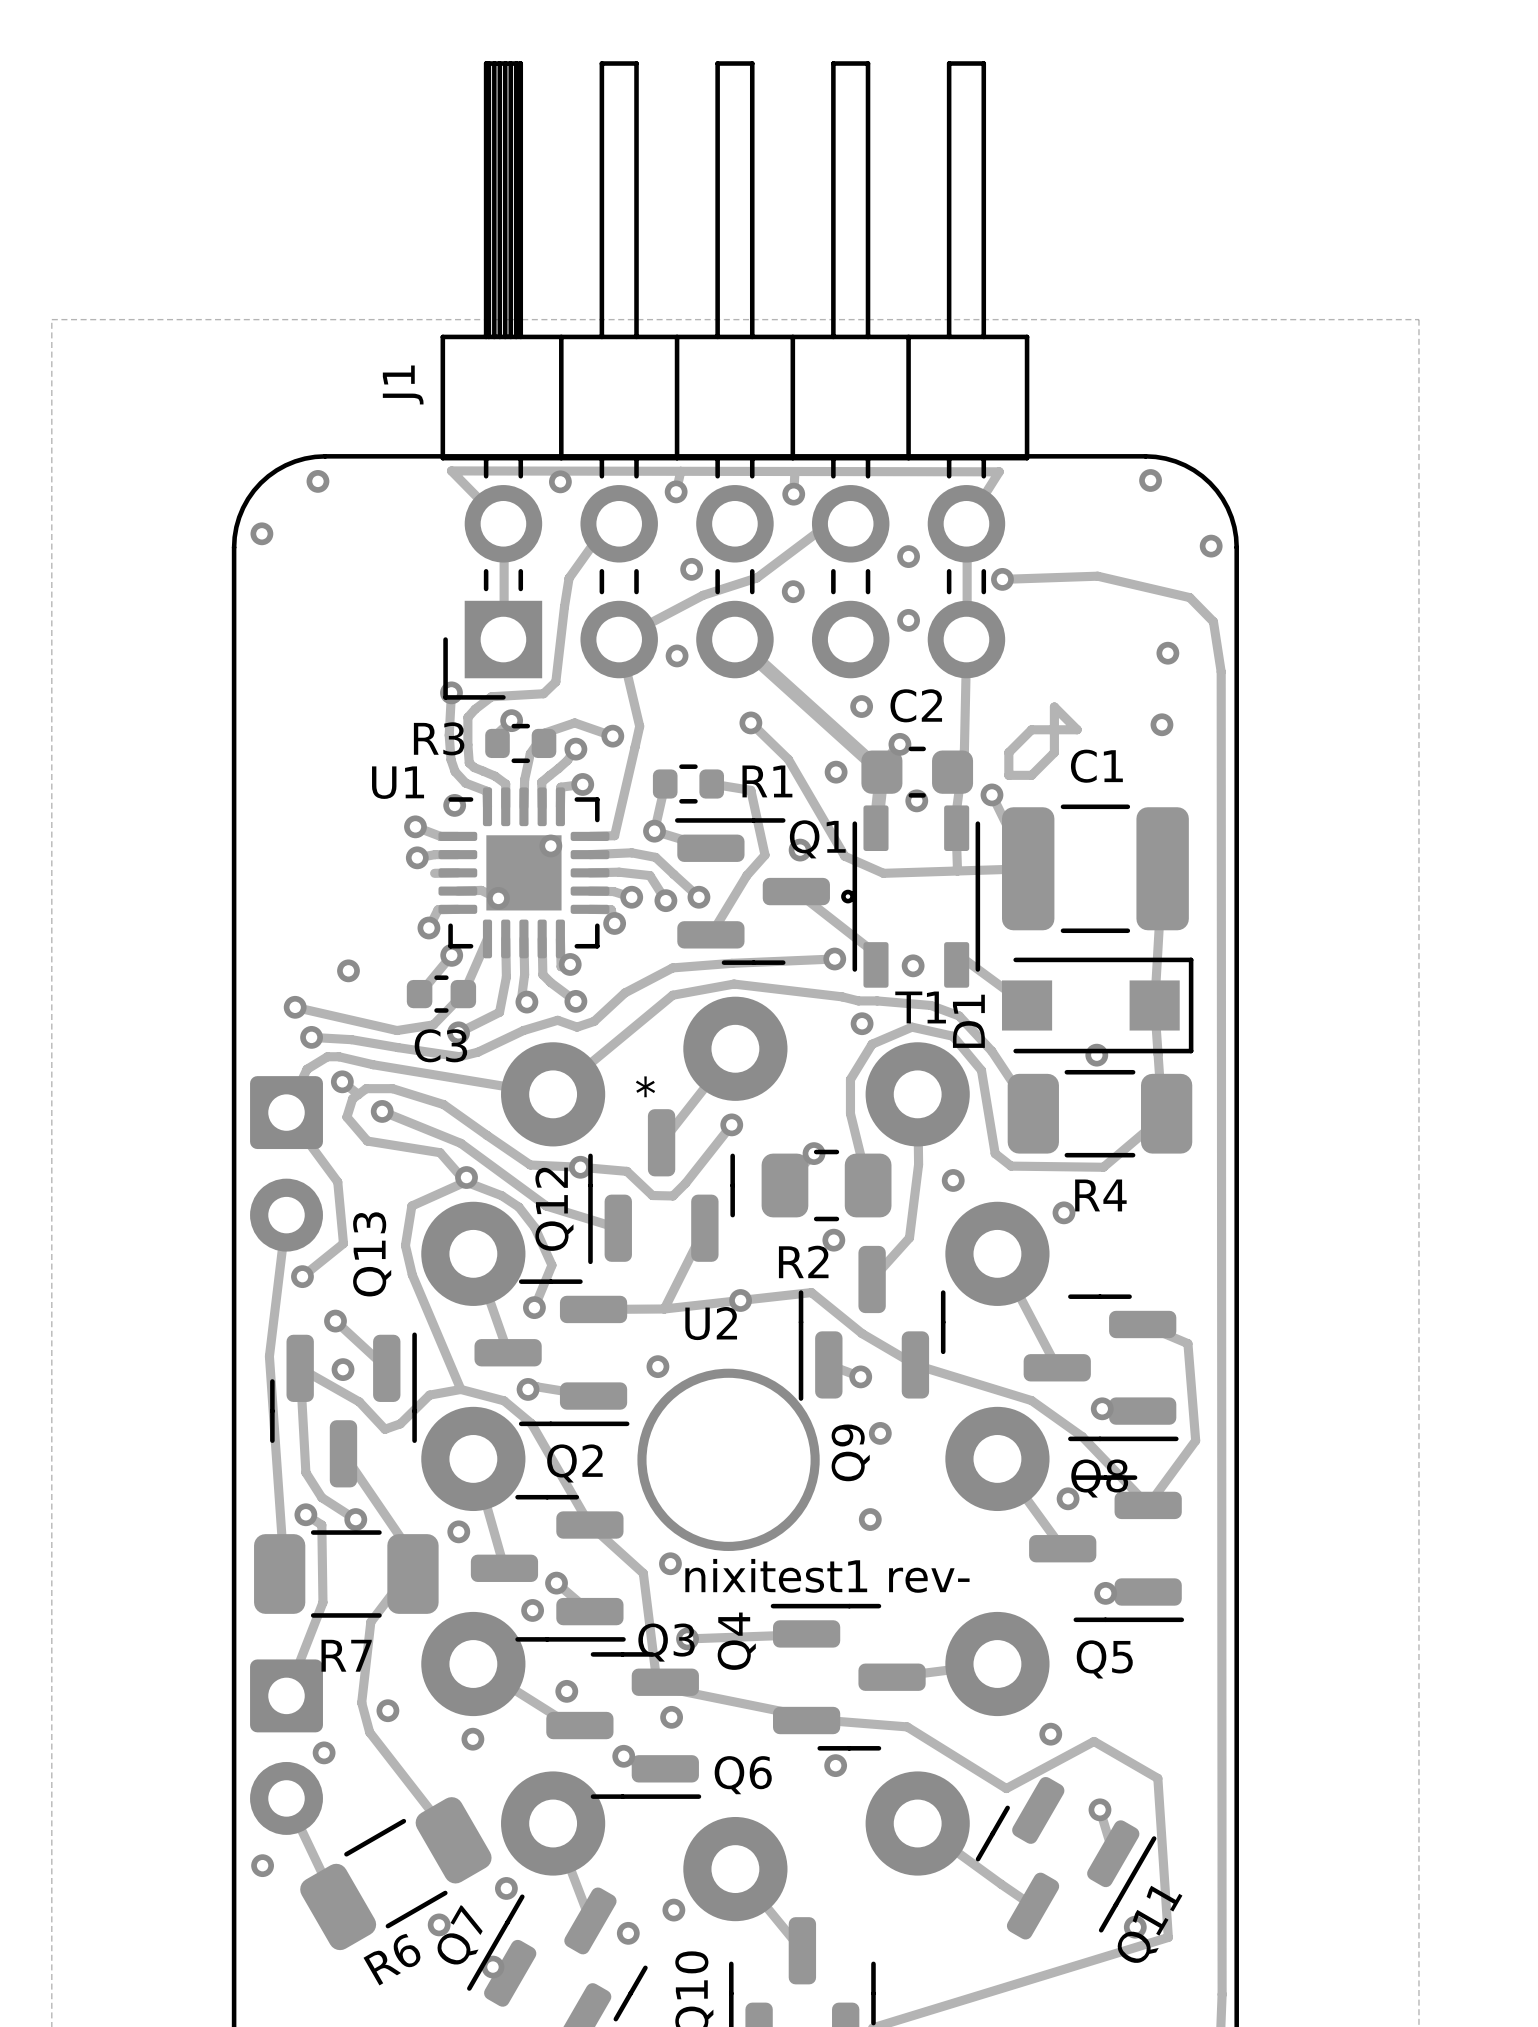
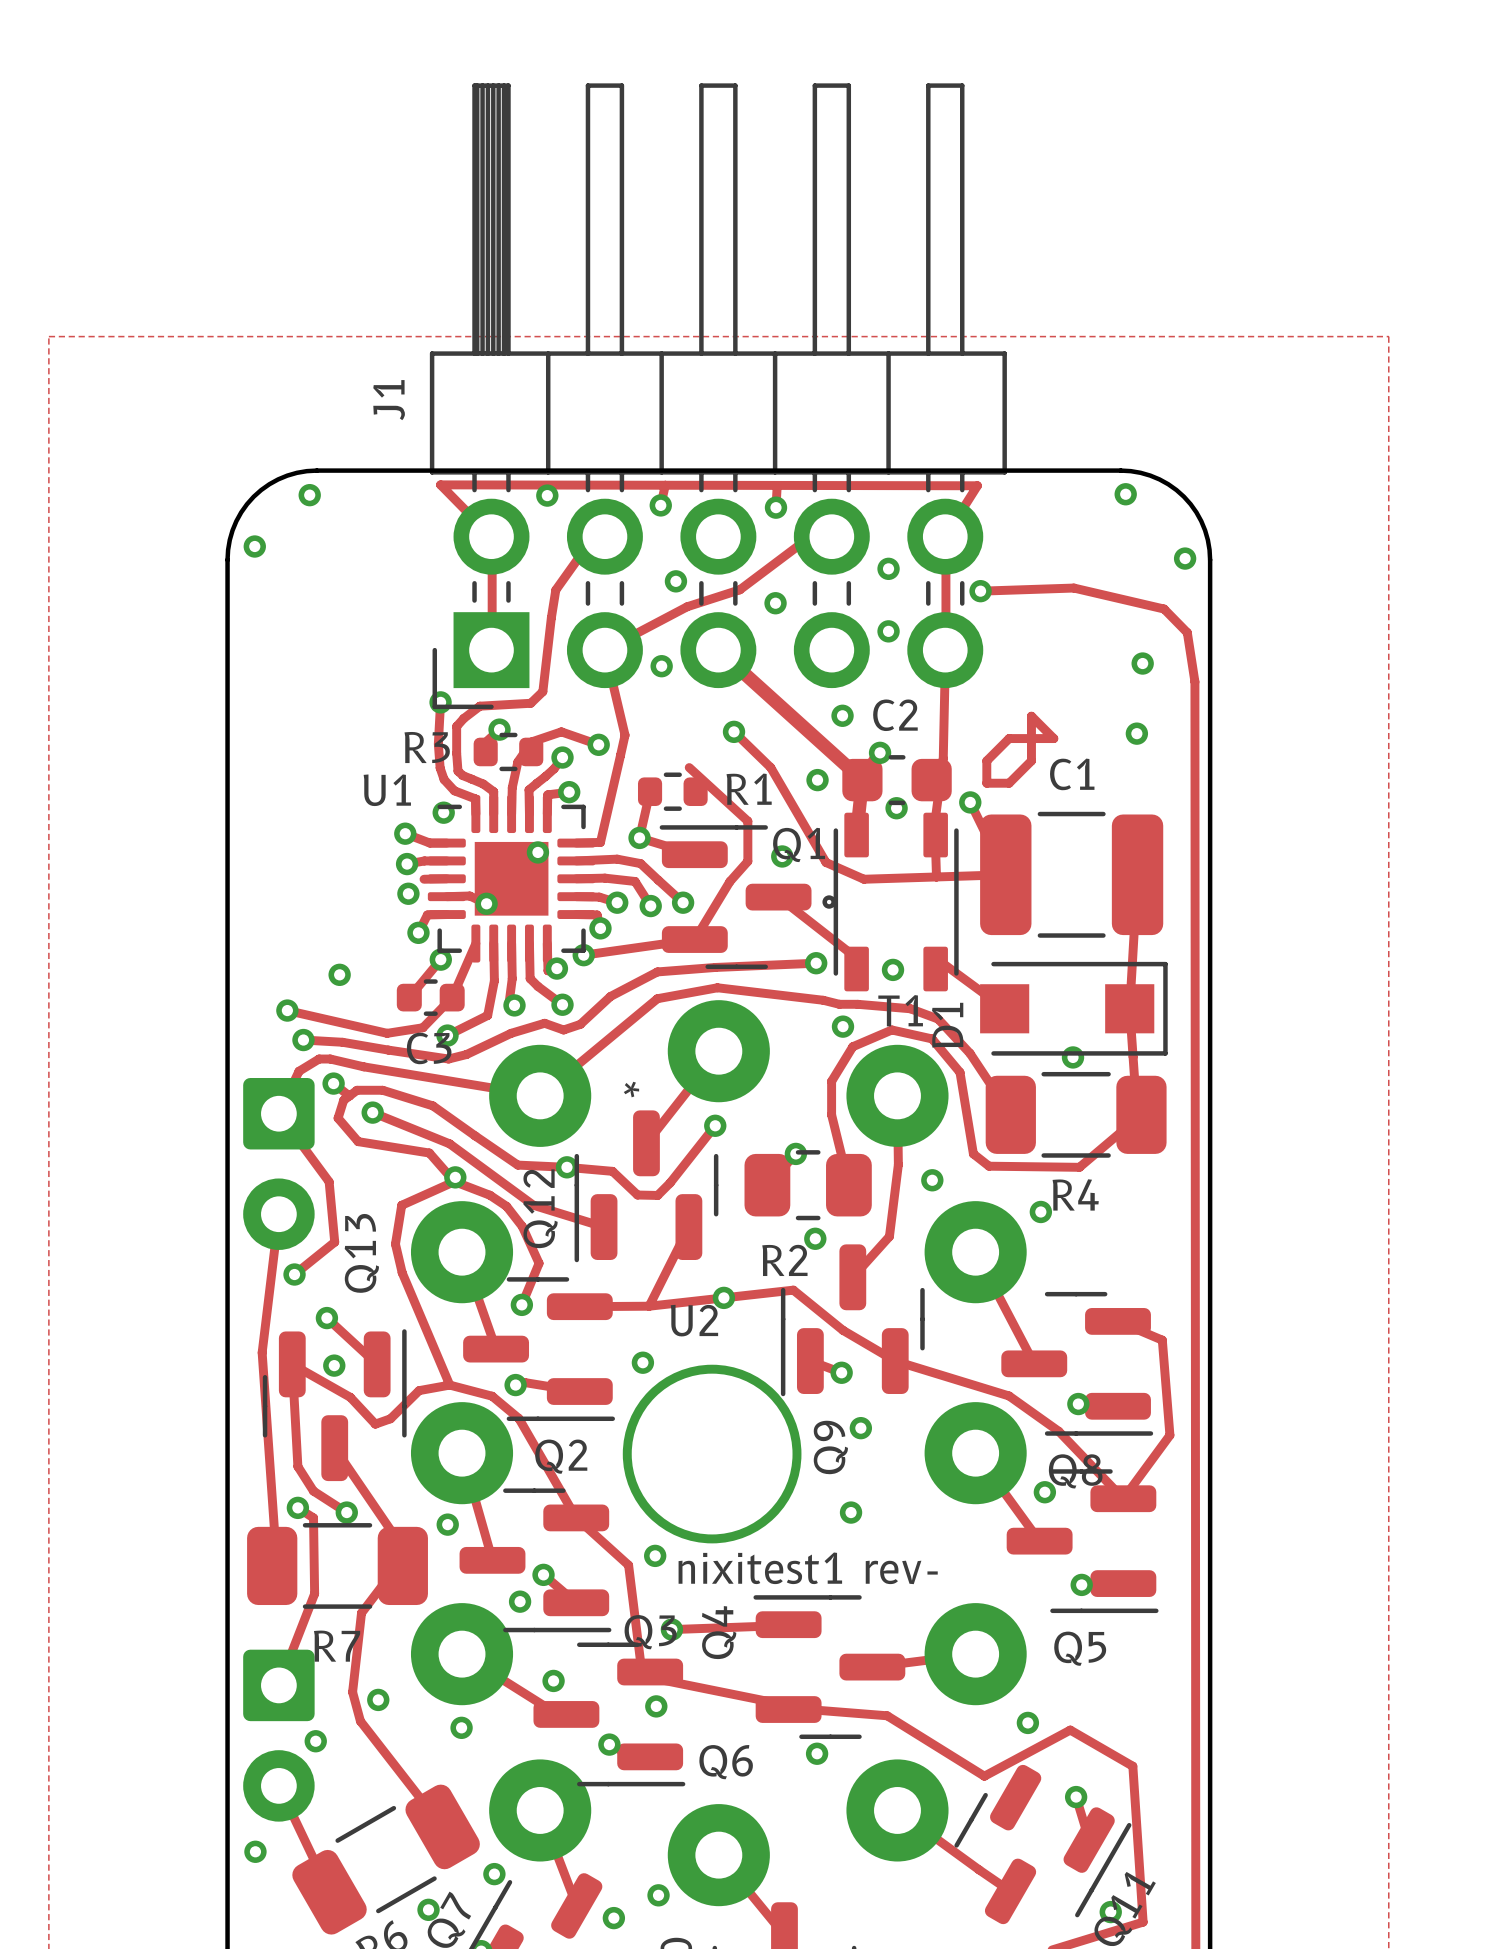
track: (711, 784) (750, 790) (765, 855) -> (689, 767) (747, 821) (747, 861)
via: none -> (408, 893)
track: none -> (694, 939) (583, 955)
via: none -> (583, 955)

